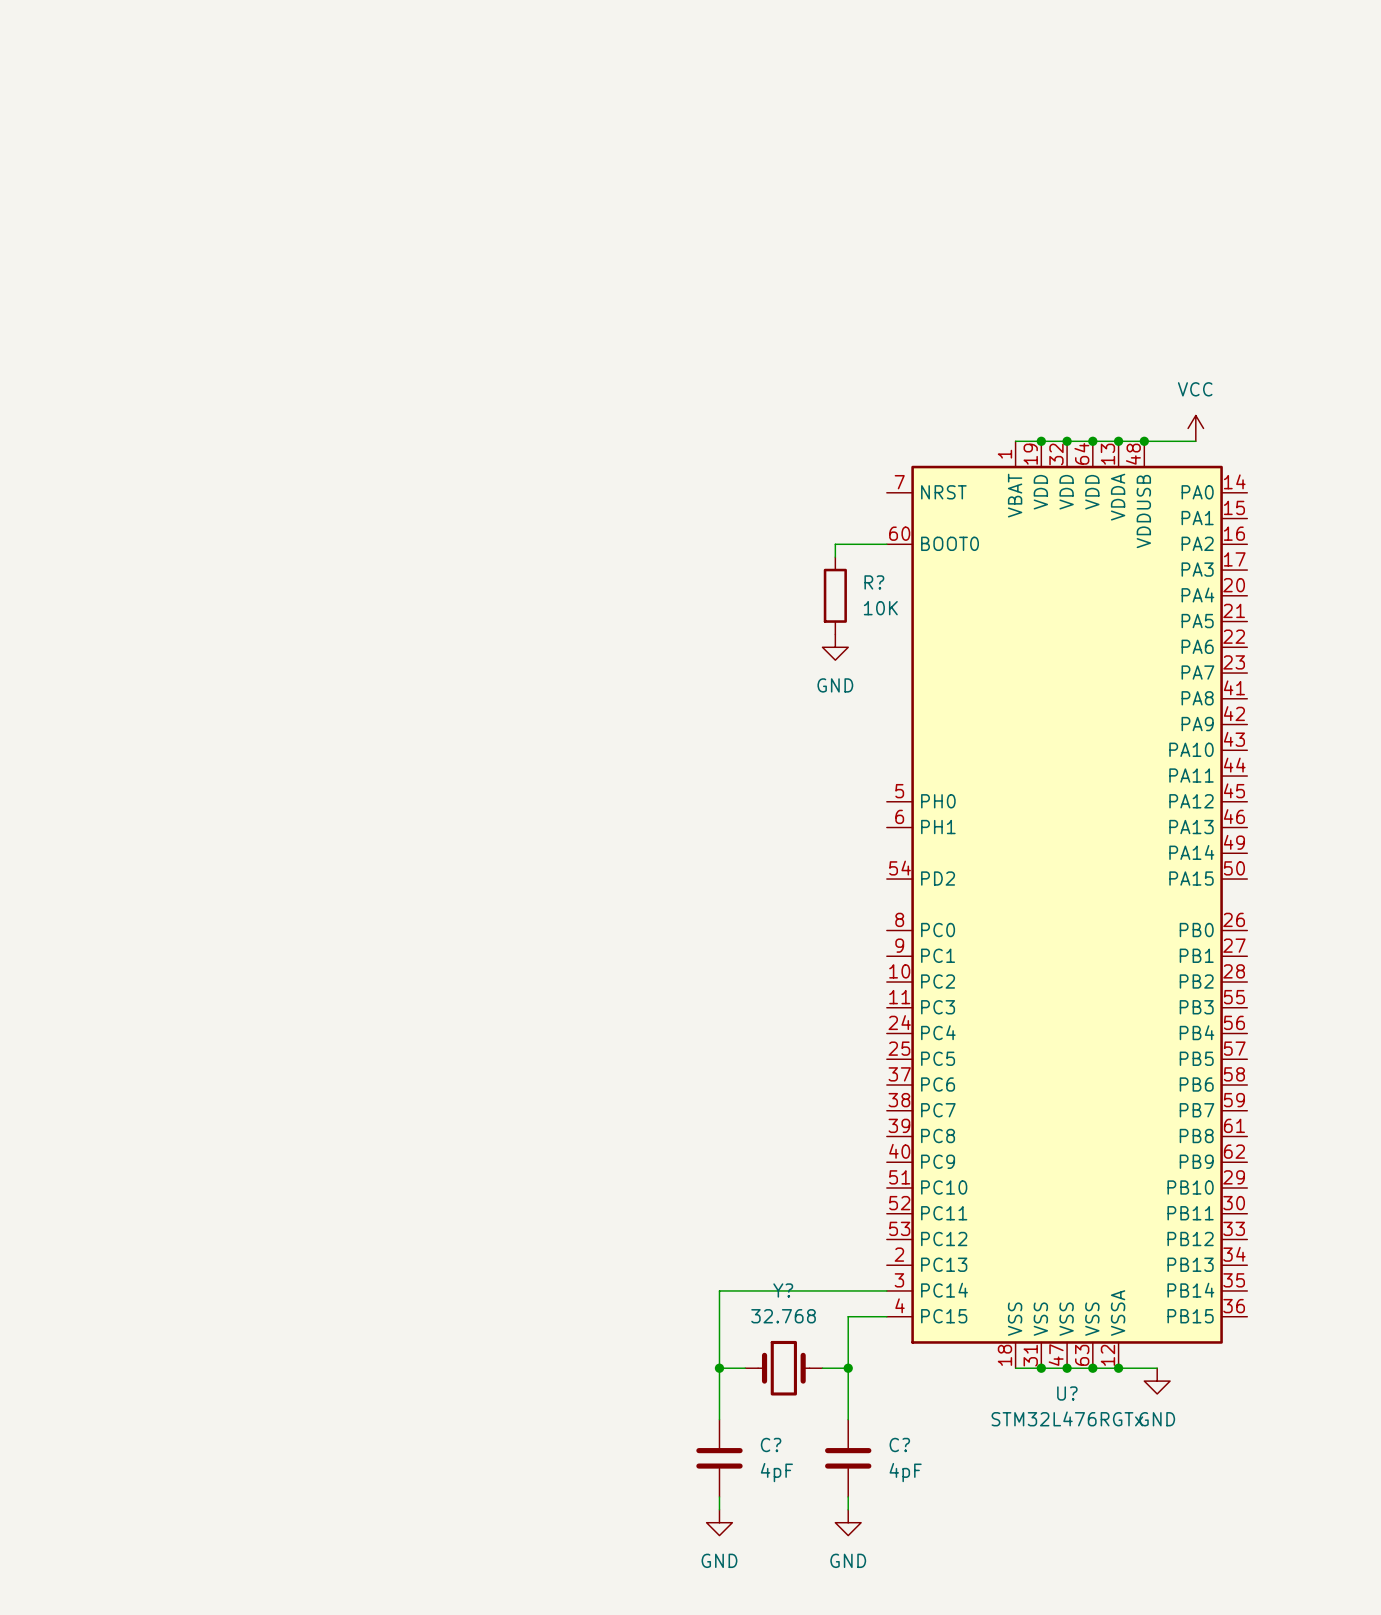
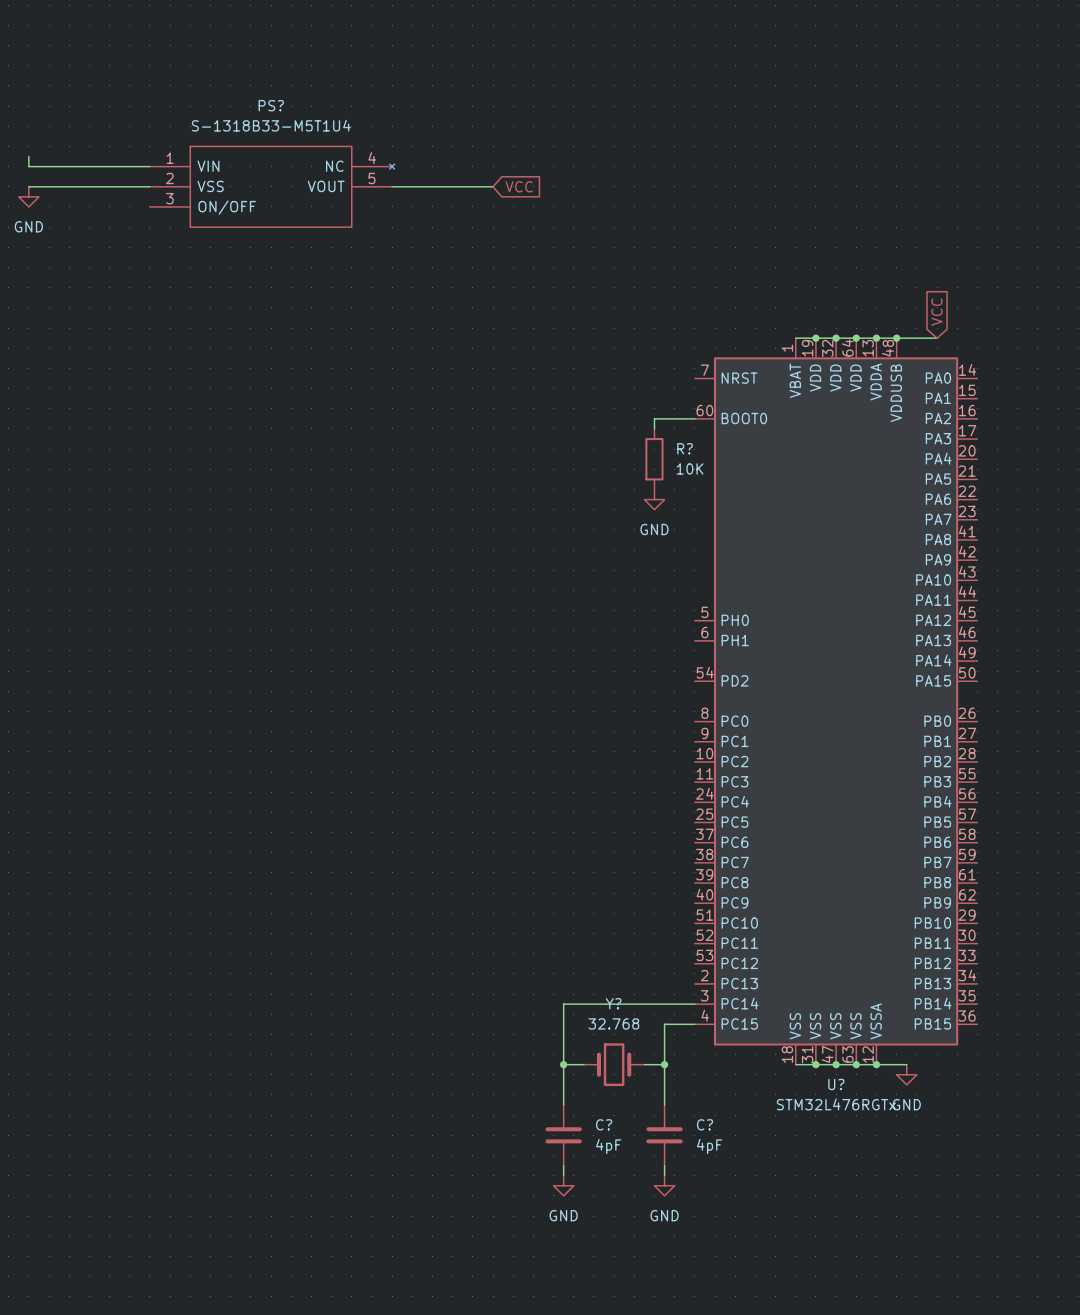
wire: none -> (28, 156) (28, 166) (149, 166)
wire: none -> (28, 186) (149, 186)
PS?: none -> S-1318B33-M5T1U4 (272, 186)
wire: none -> (392, 186) (493, 186)
global label: none -> VCC (519, 186)
power symbol: none -> GND (28, 196)
global label: none -> VCC (937, 312)
power symbol: VCC (1195, 428) -> none

